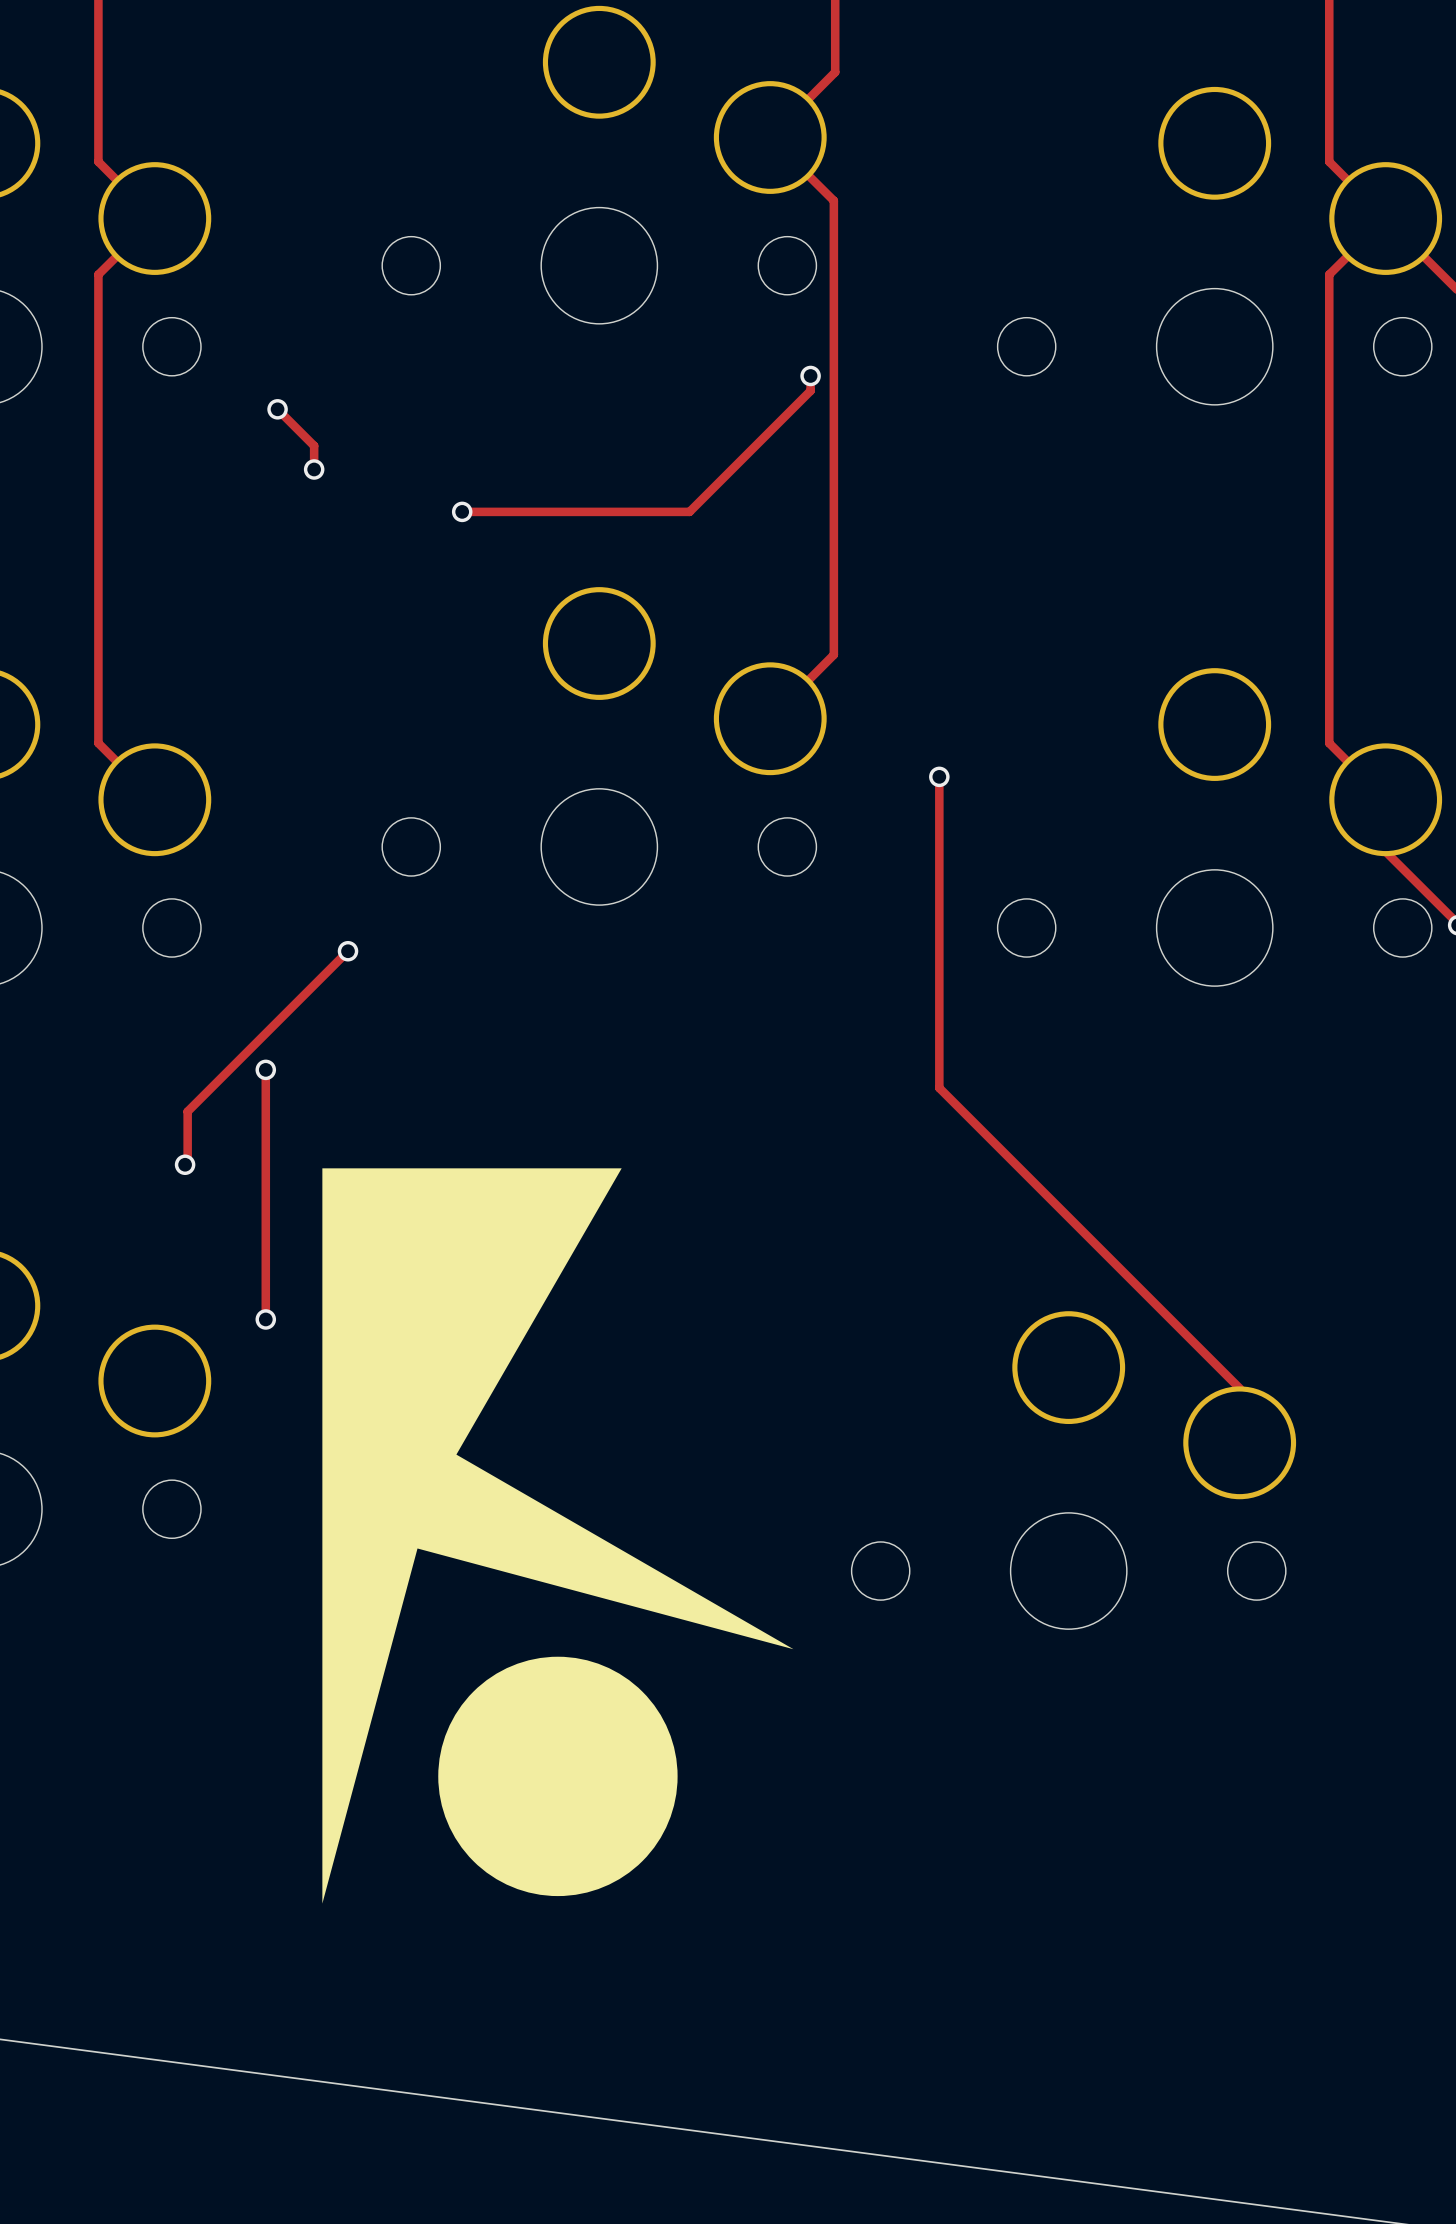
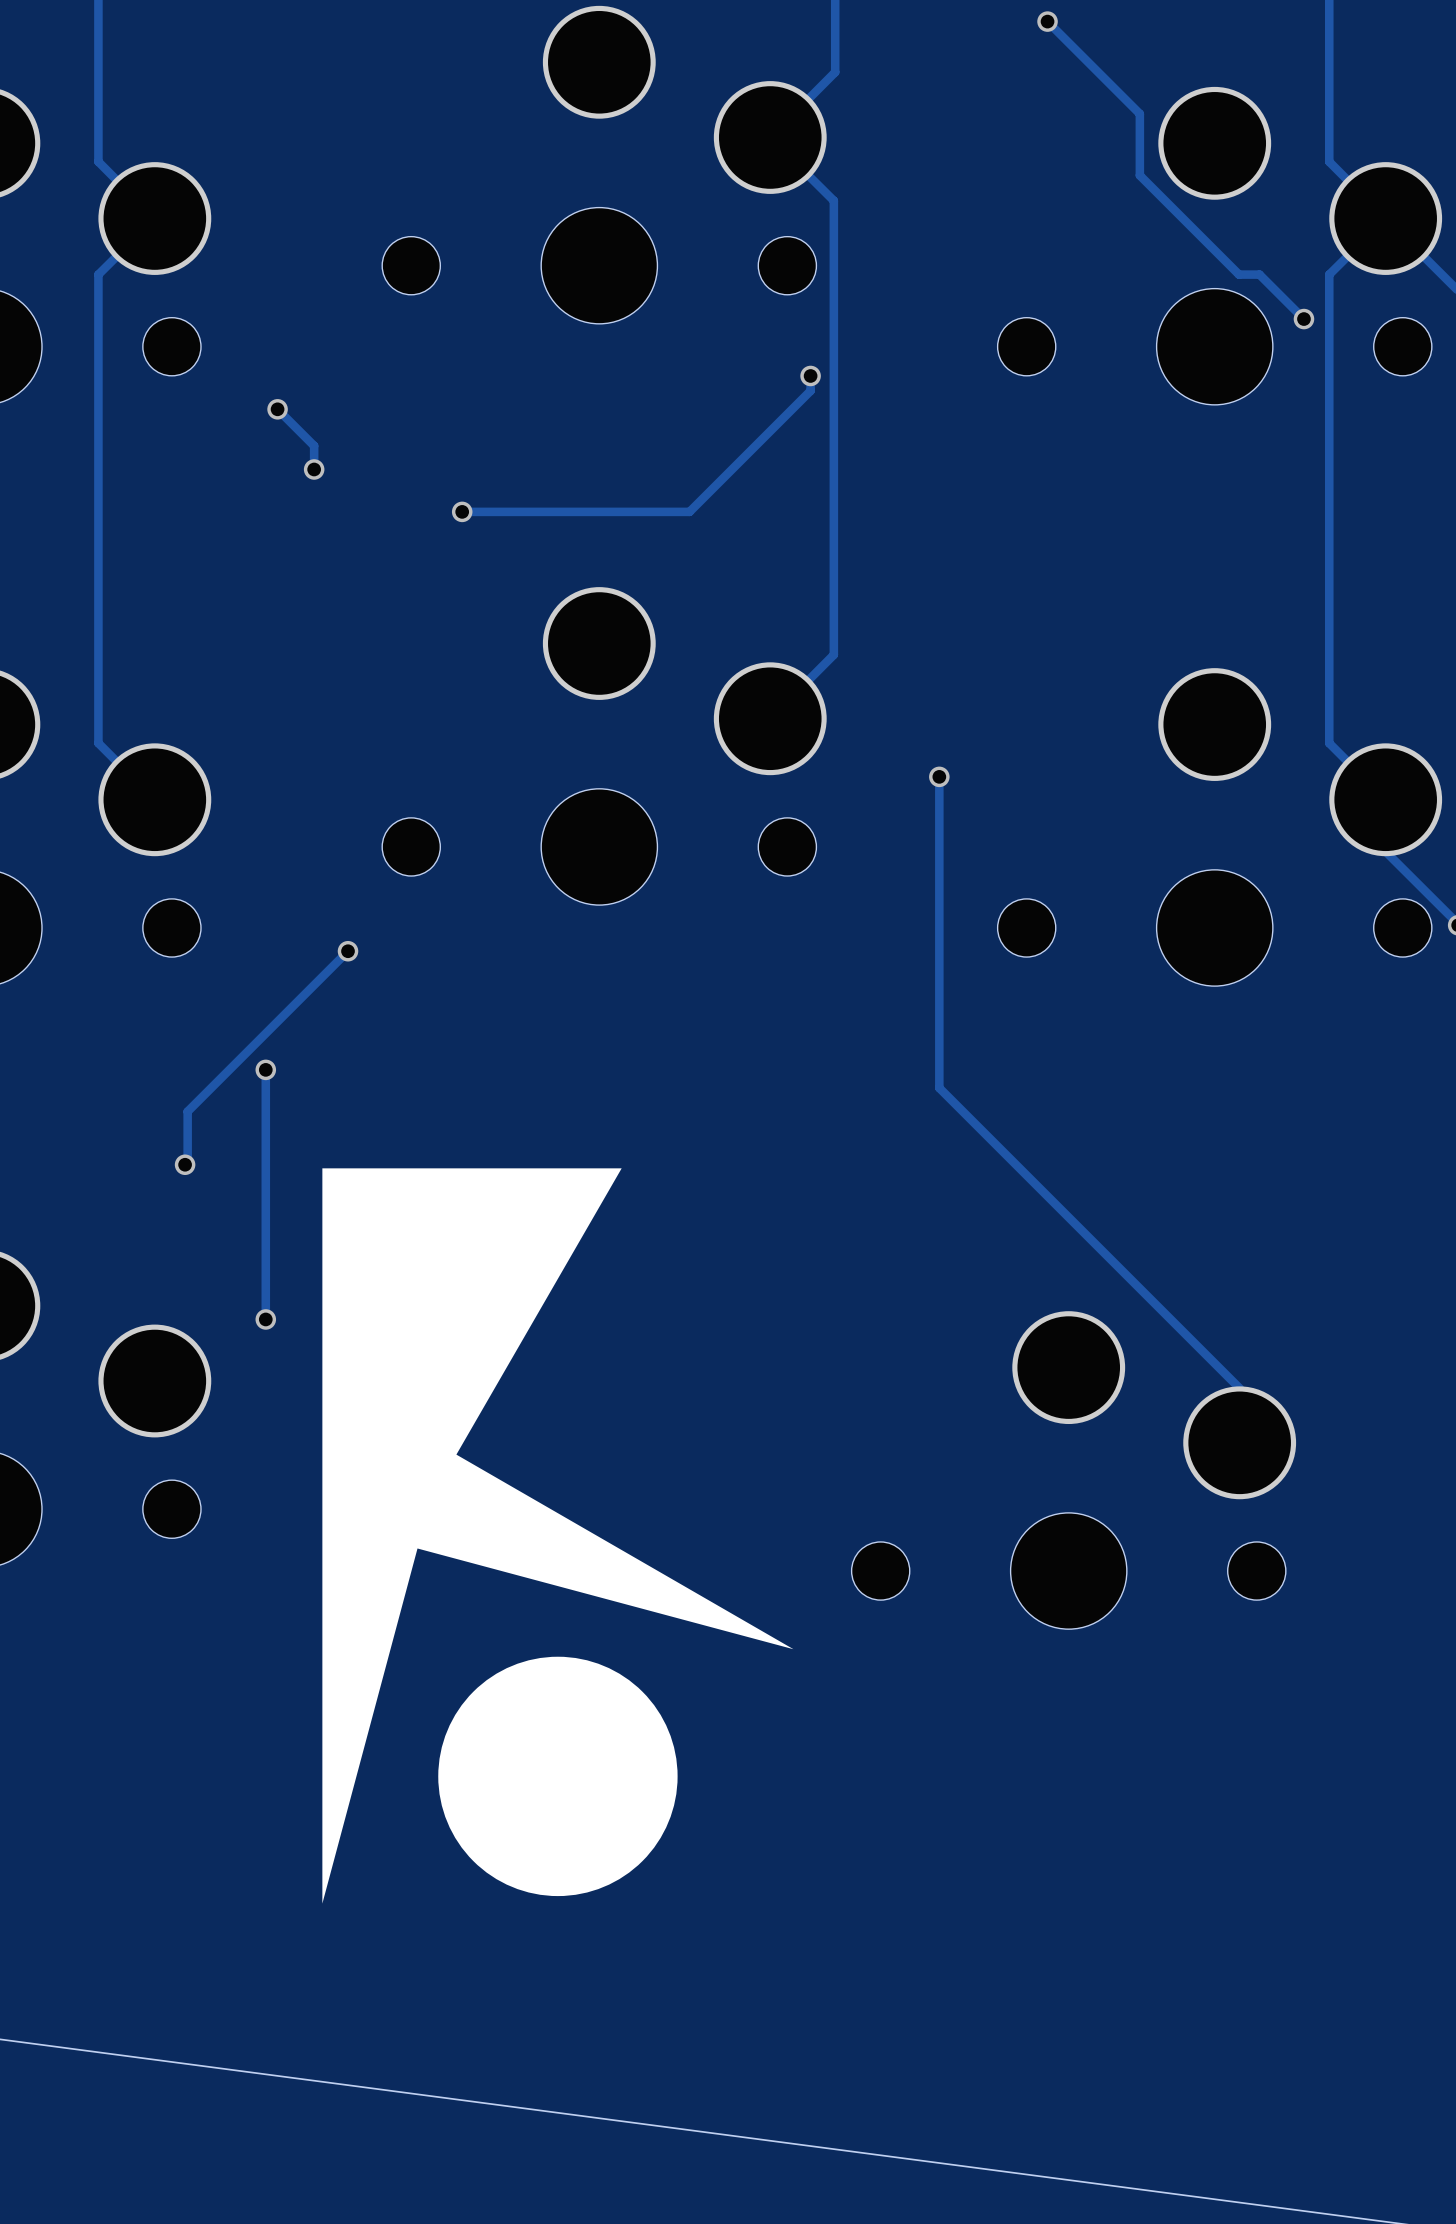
track: none -> (1047, 21) (1139, 113) (1139, 175) (1239, 274) (1259, 274) (1303, 319)
via: none -> (1047, 21)
via: none -> (1303, 319)

